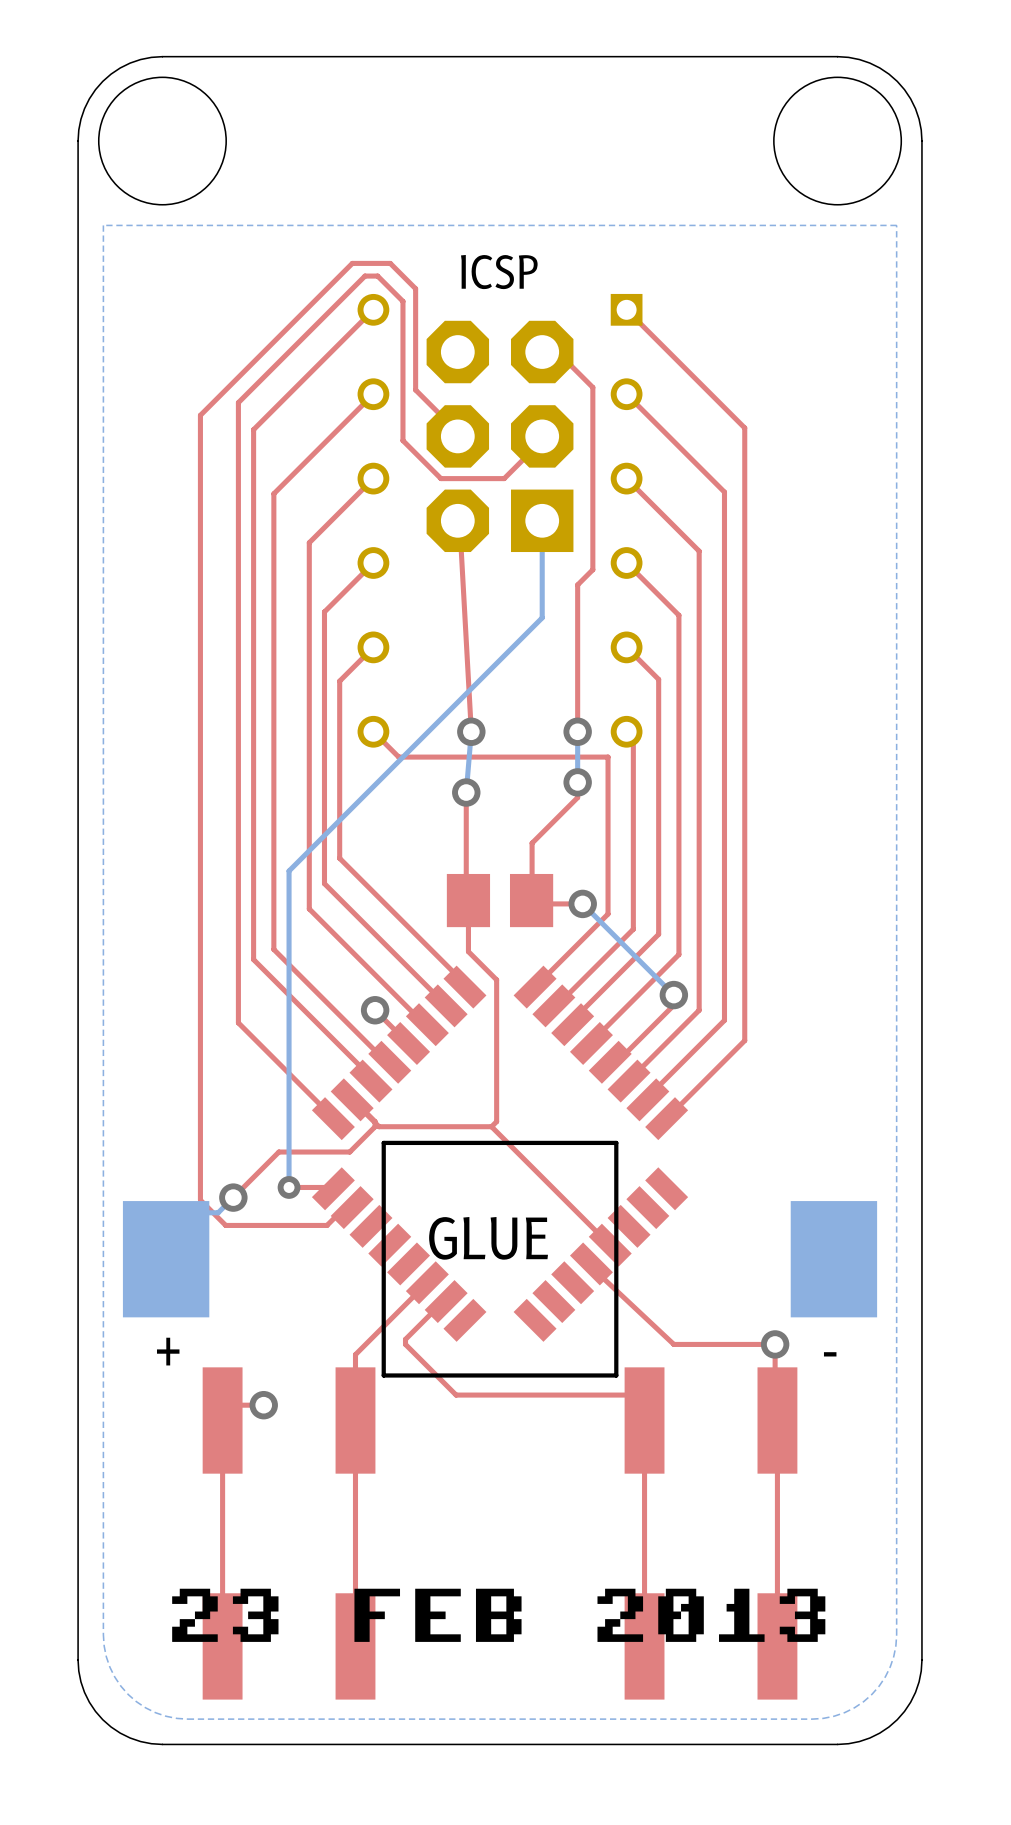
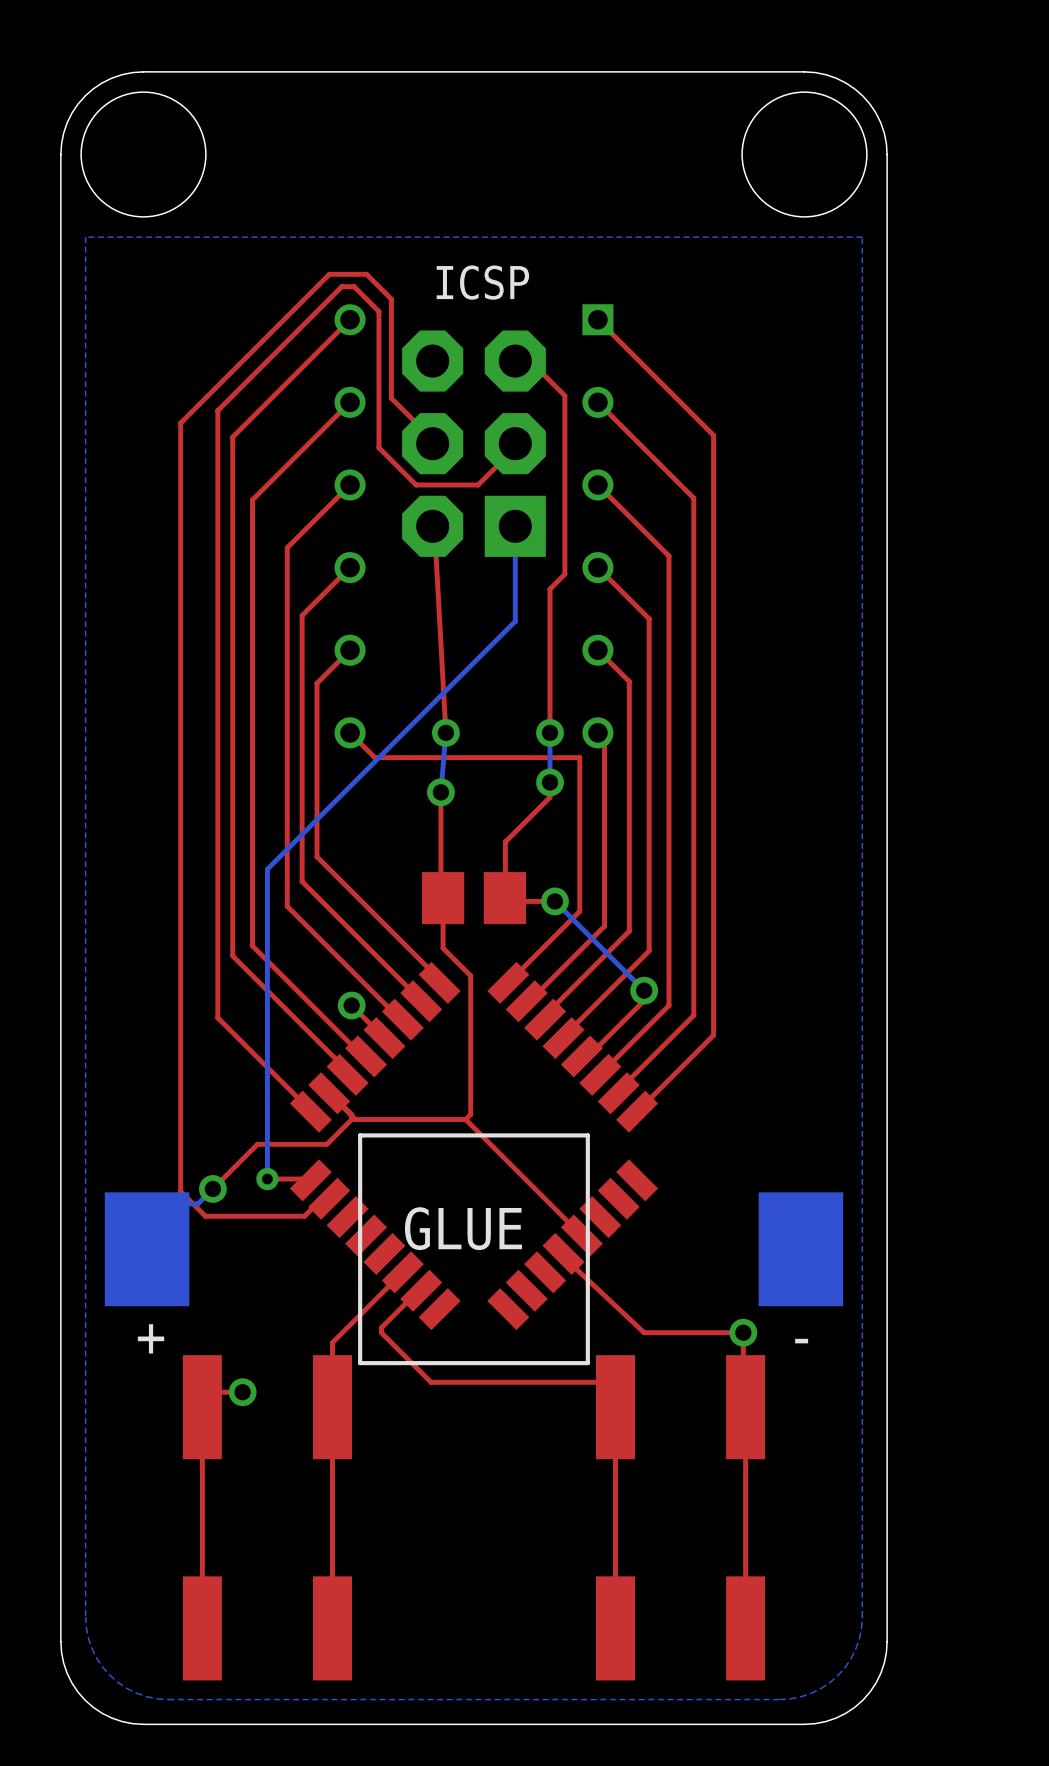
drawing: [172, 1588, 826, 1642] -> none

